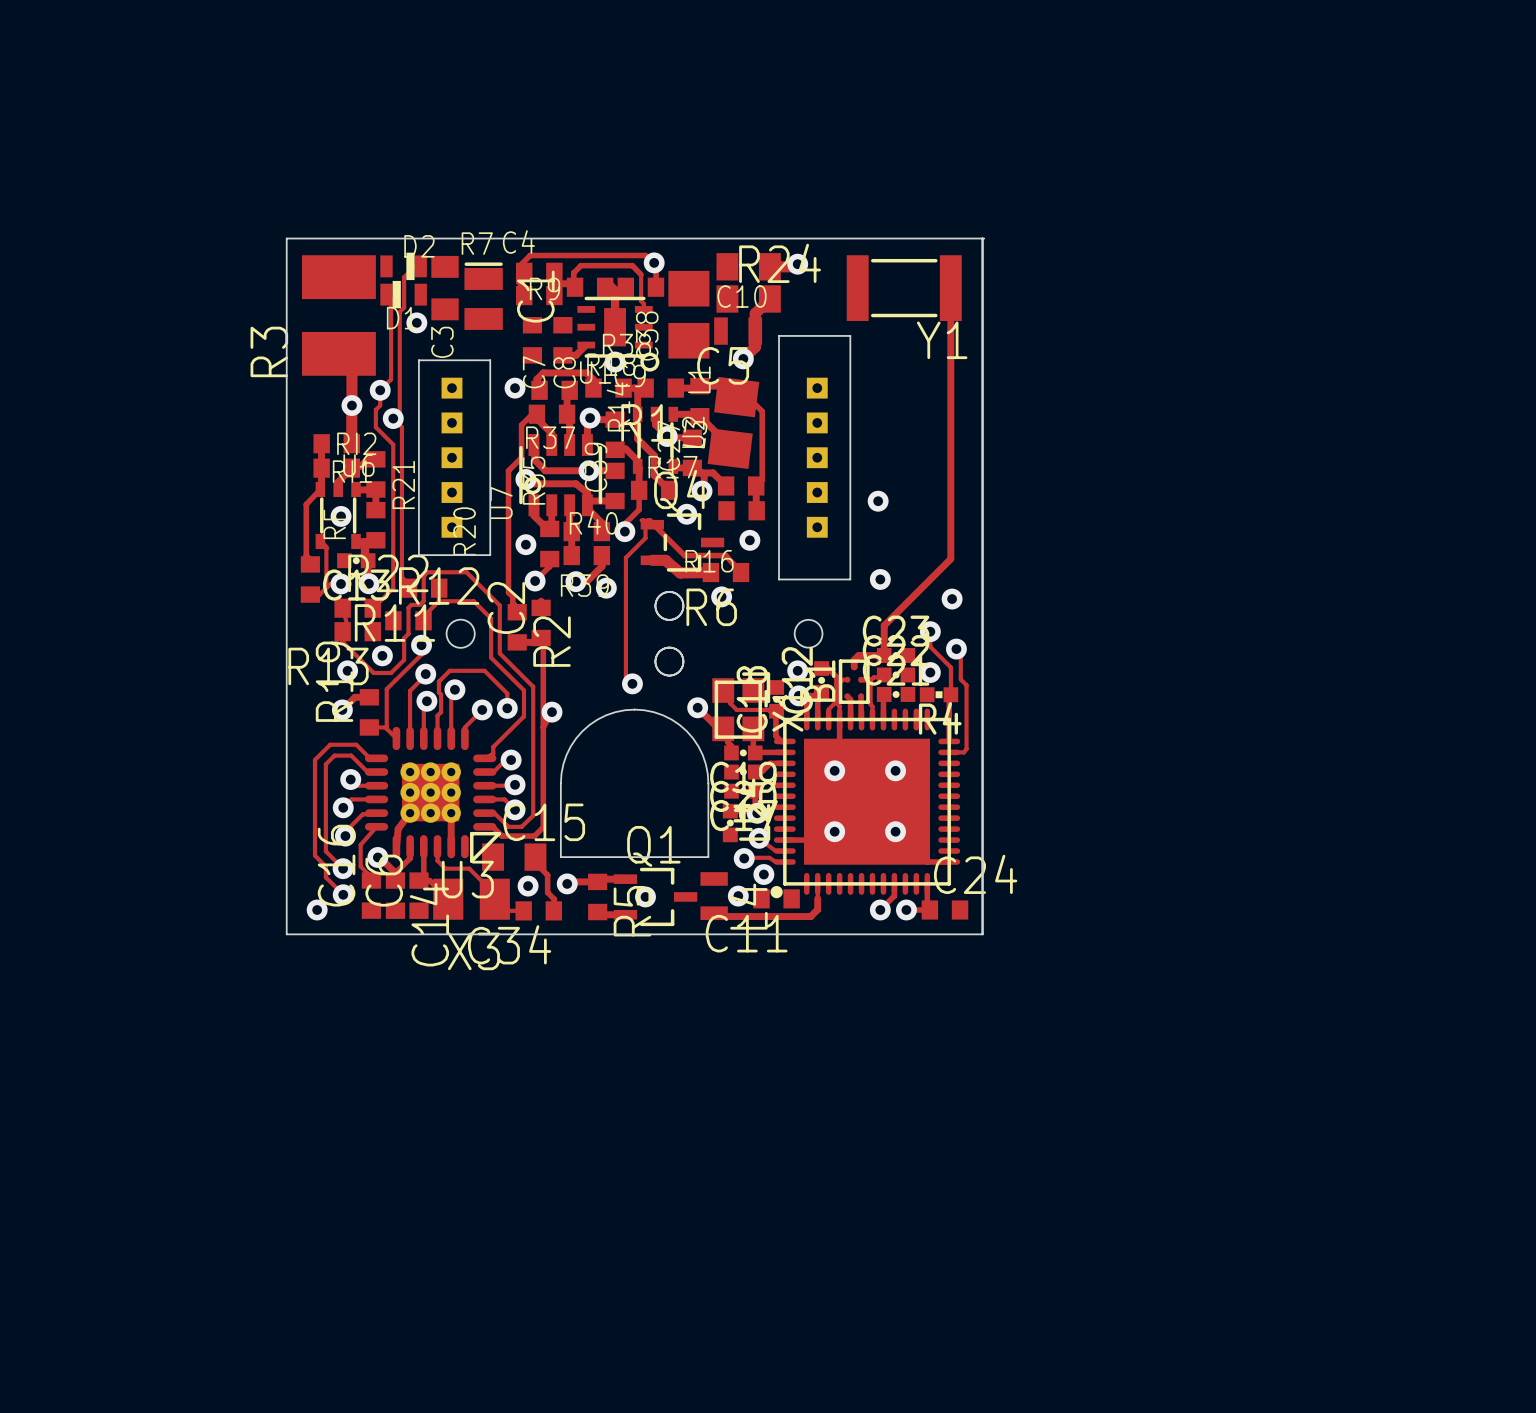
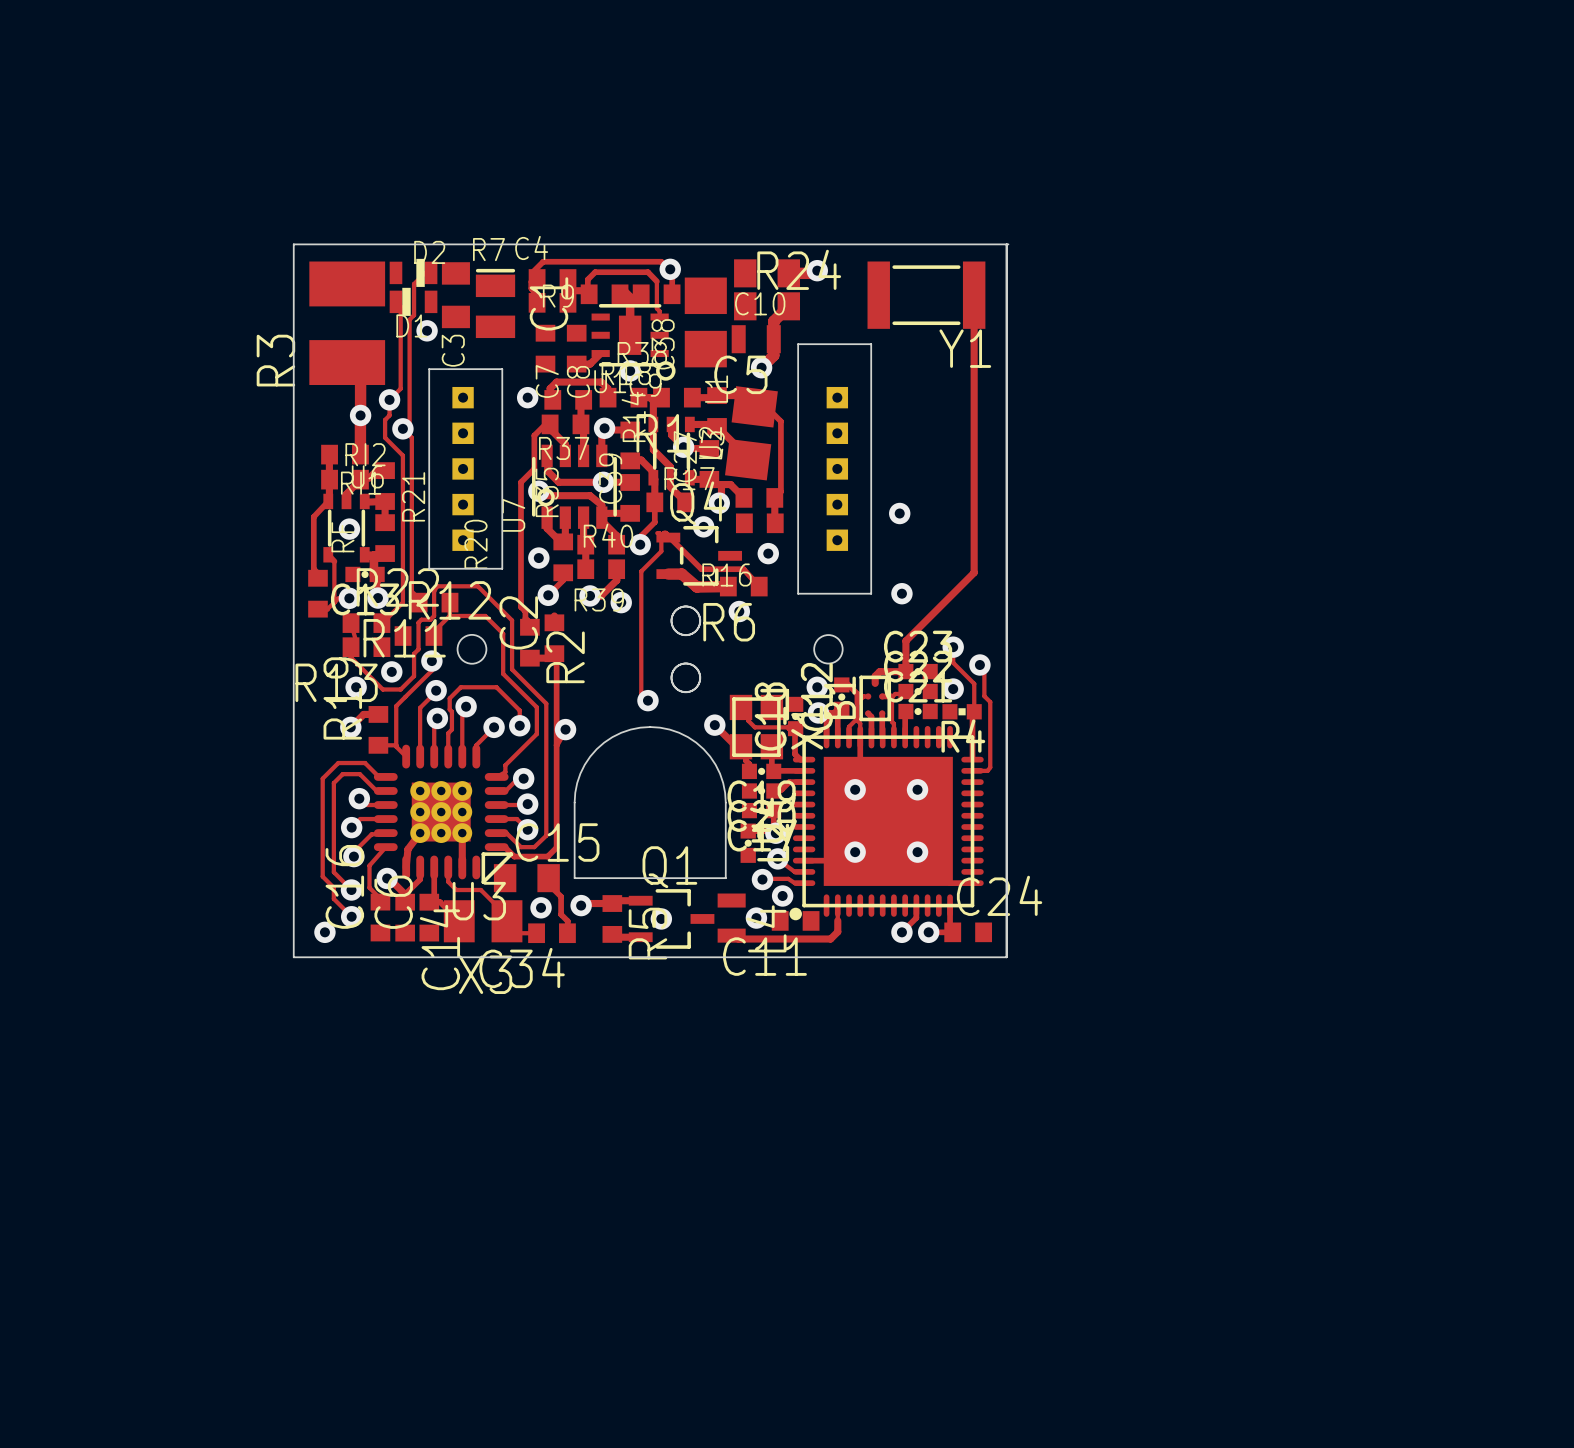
via: (952, 599) -> none

